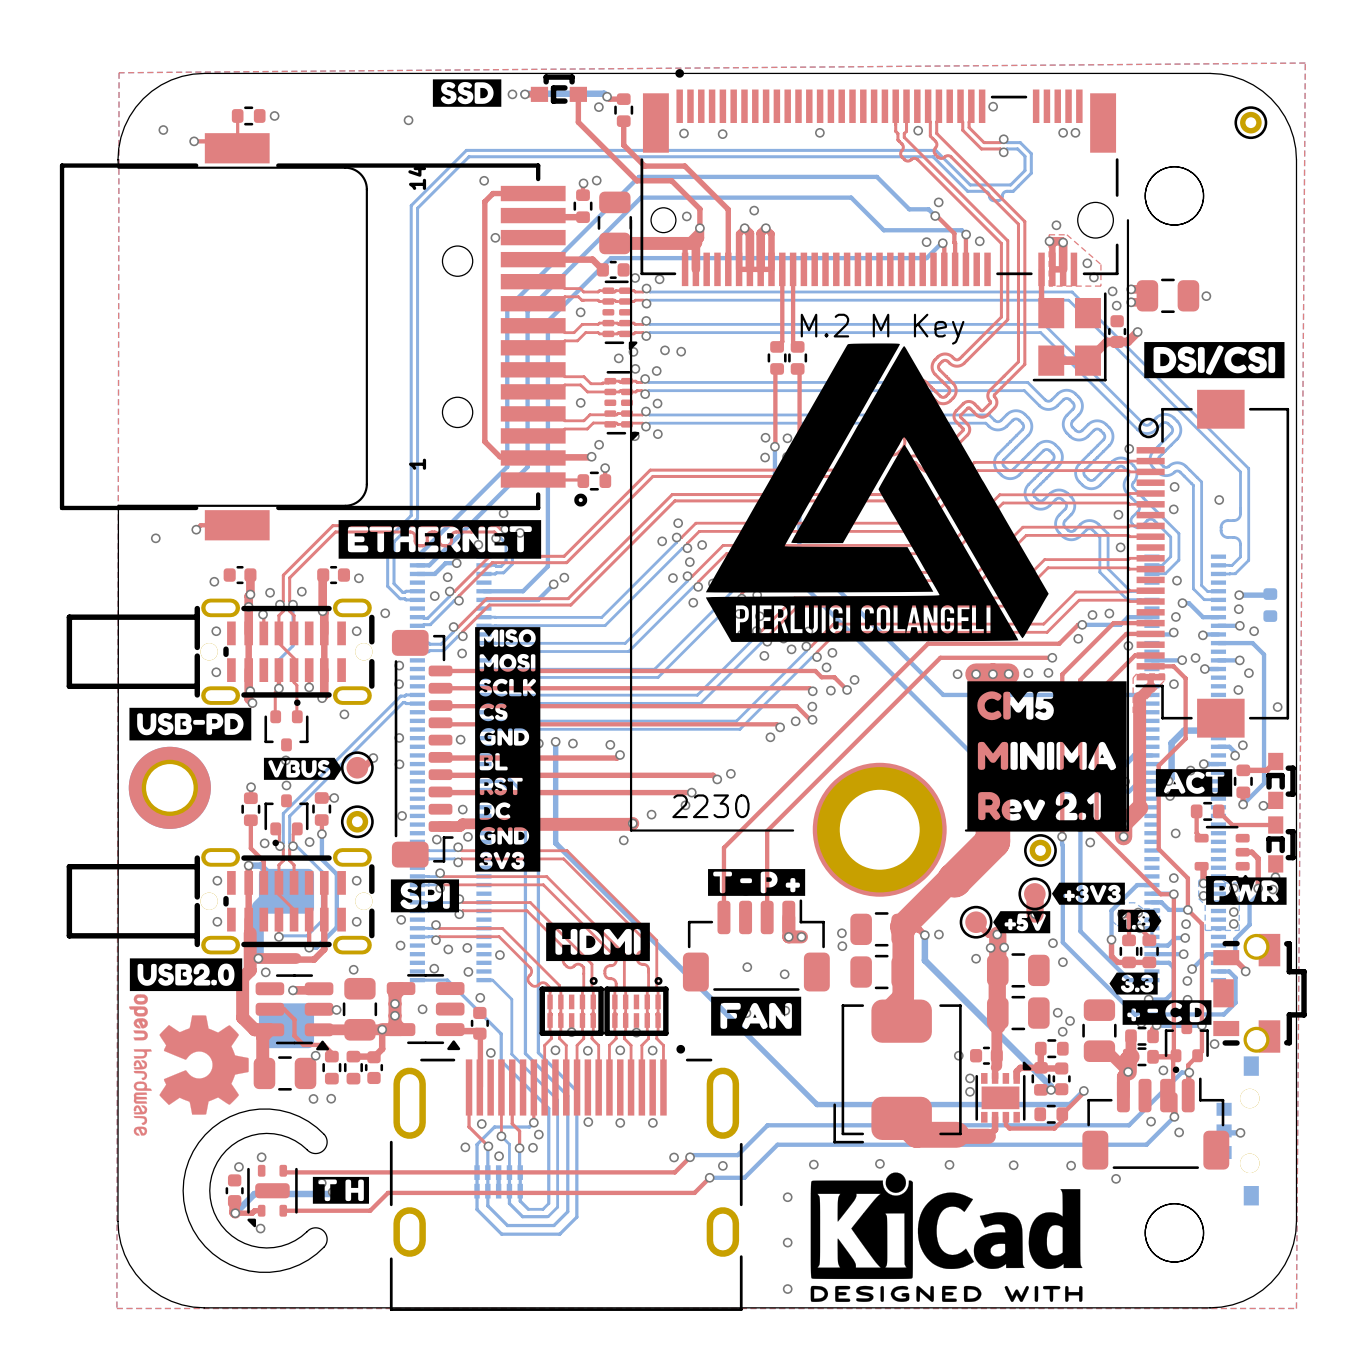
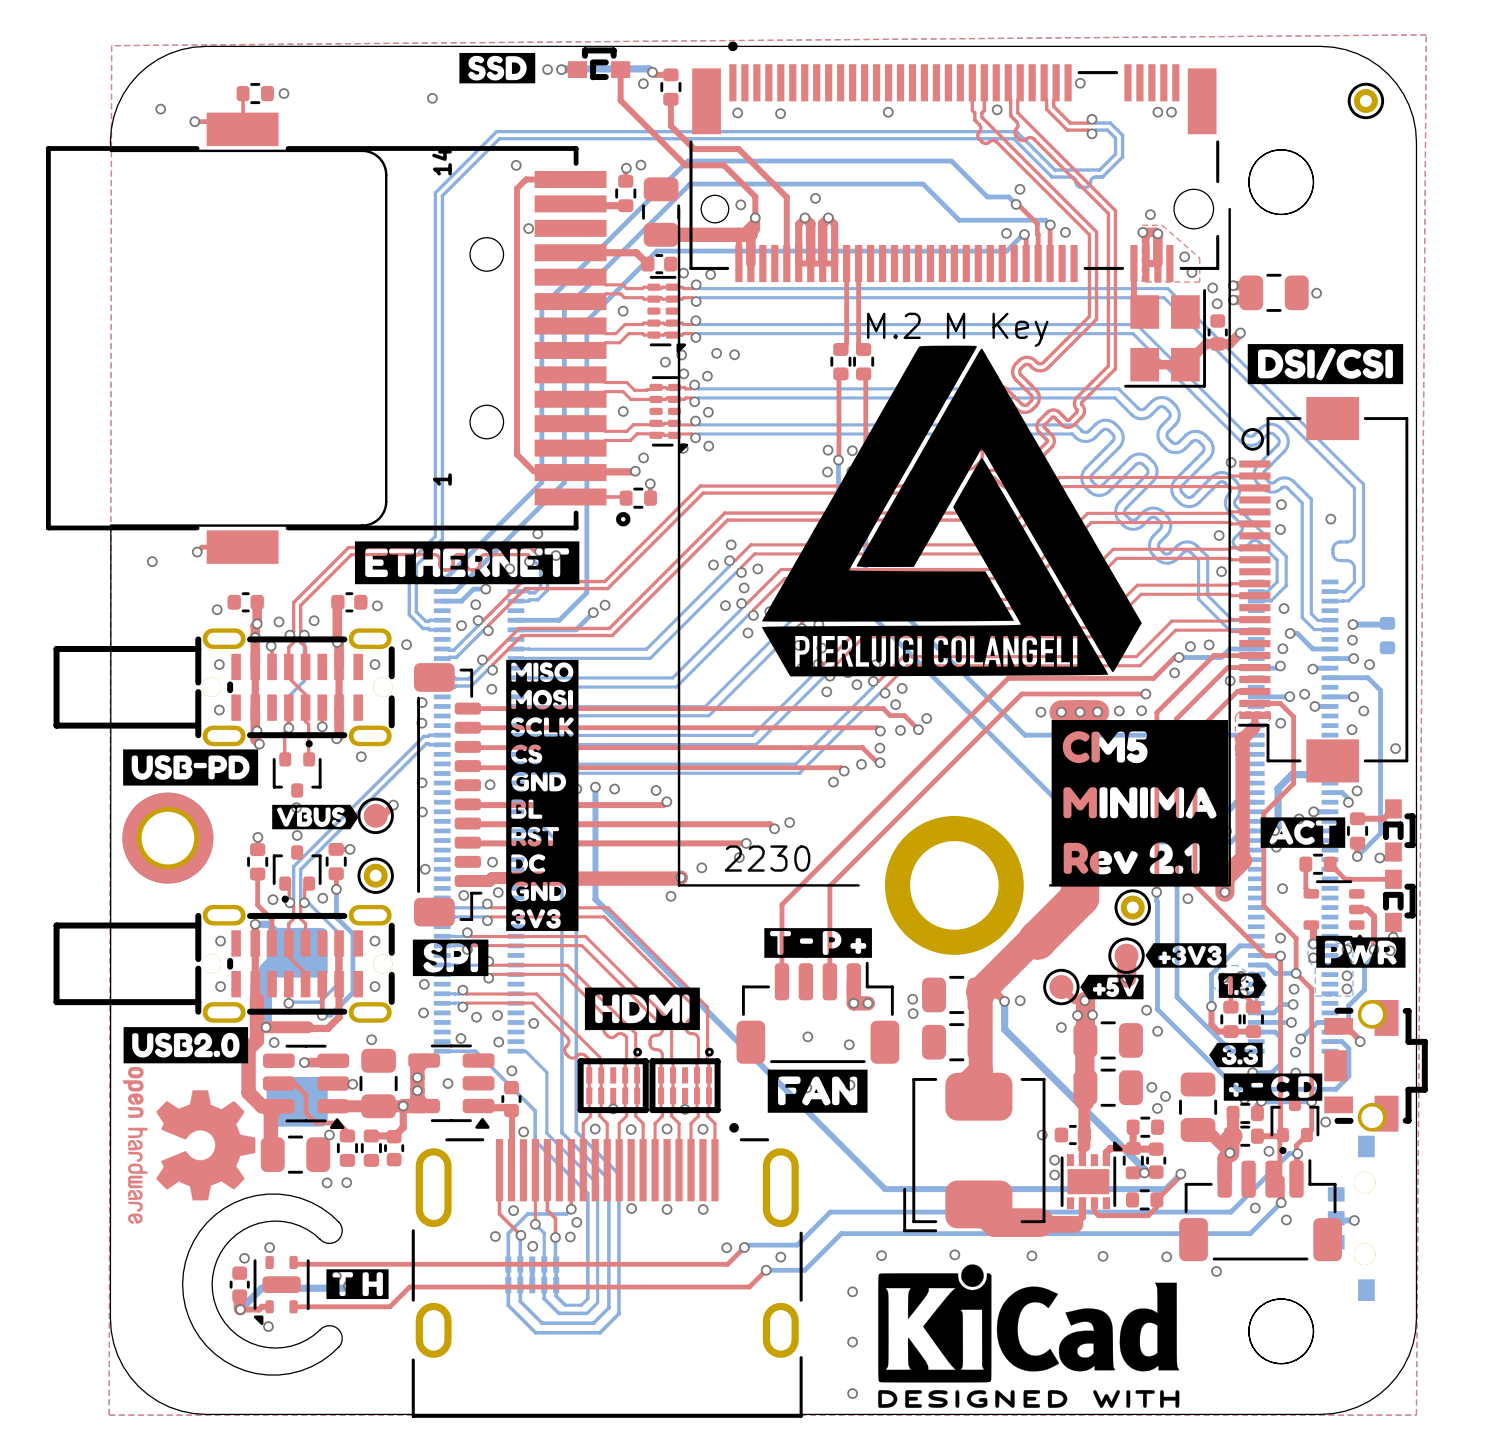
part: none -> (954, 498)
part: (879, 829) -> none

